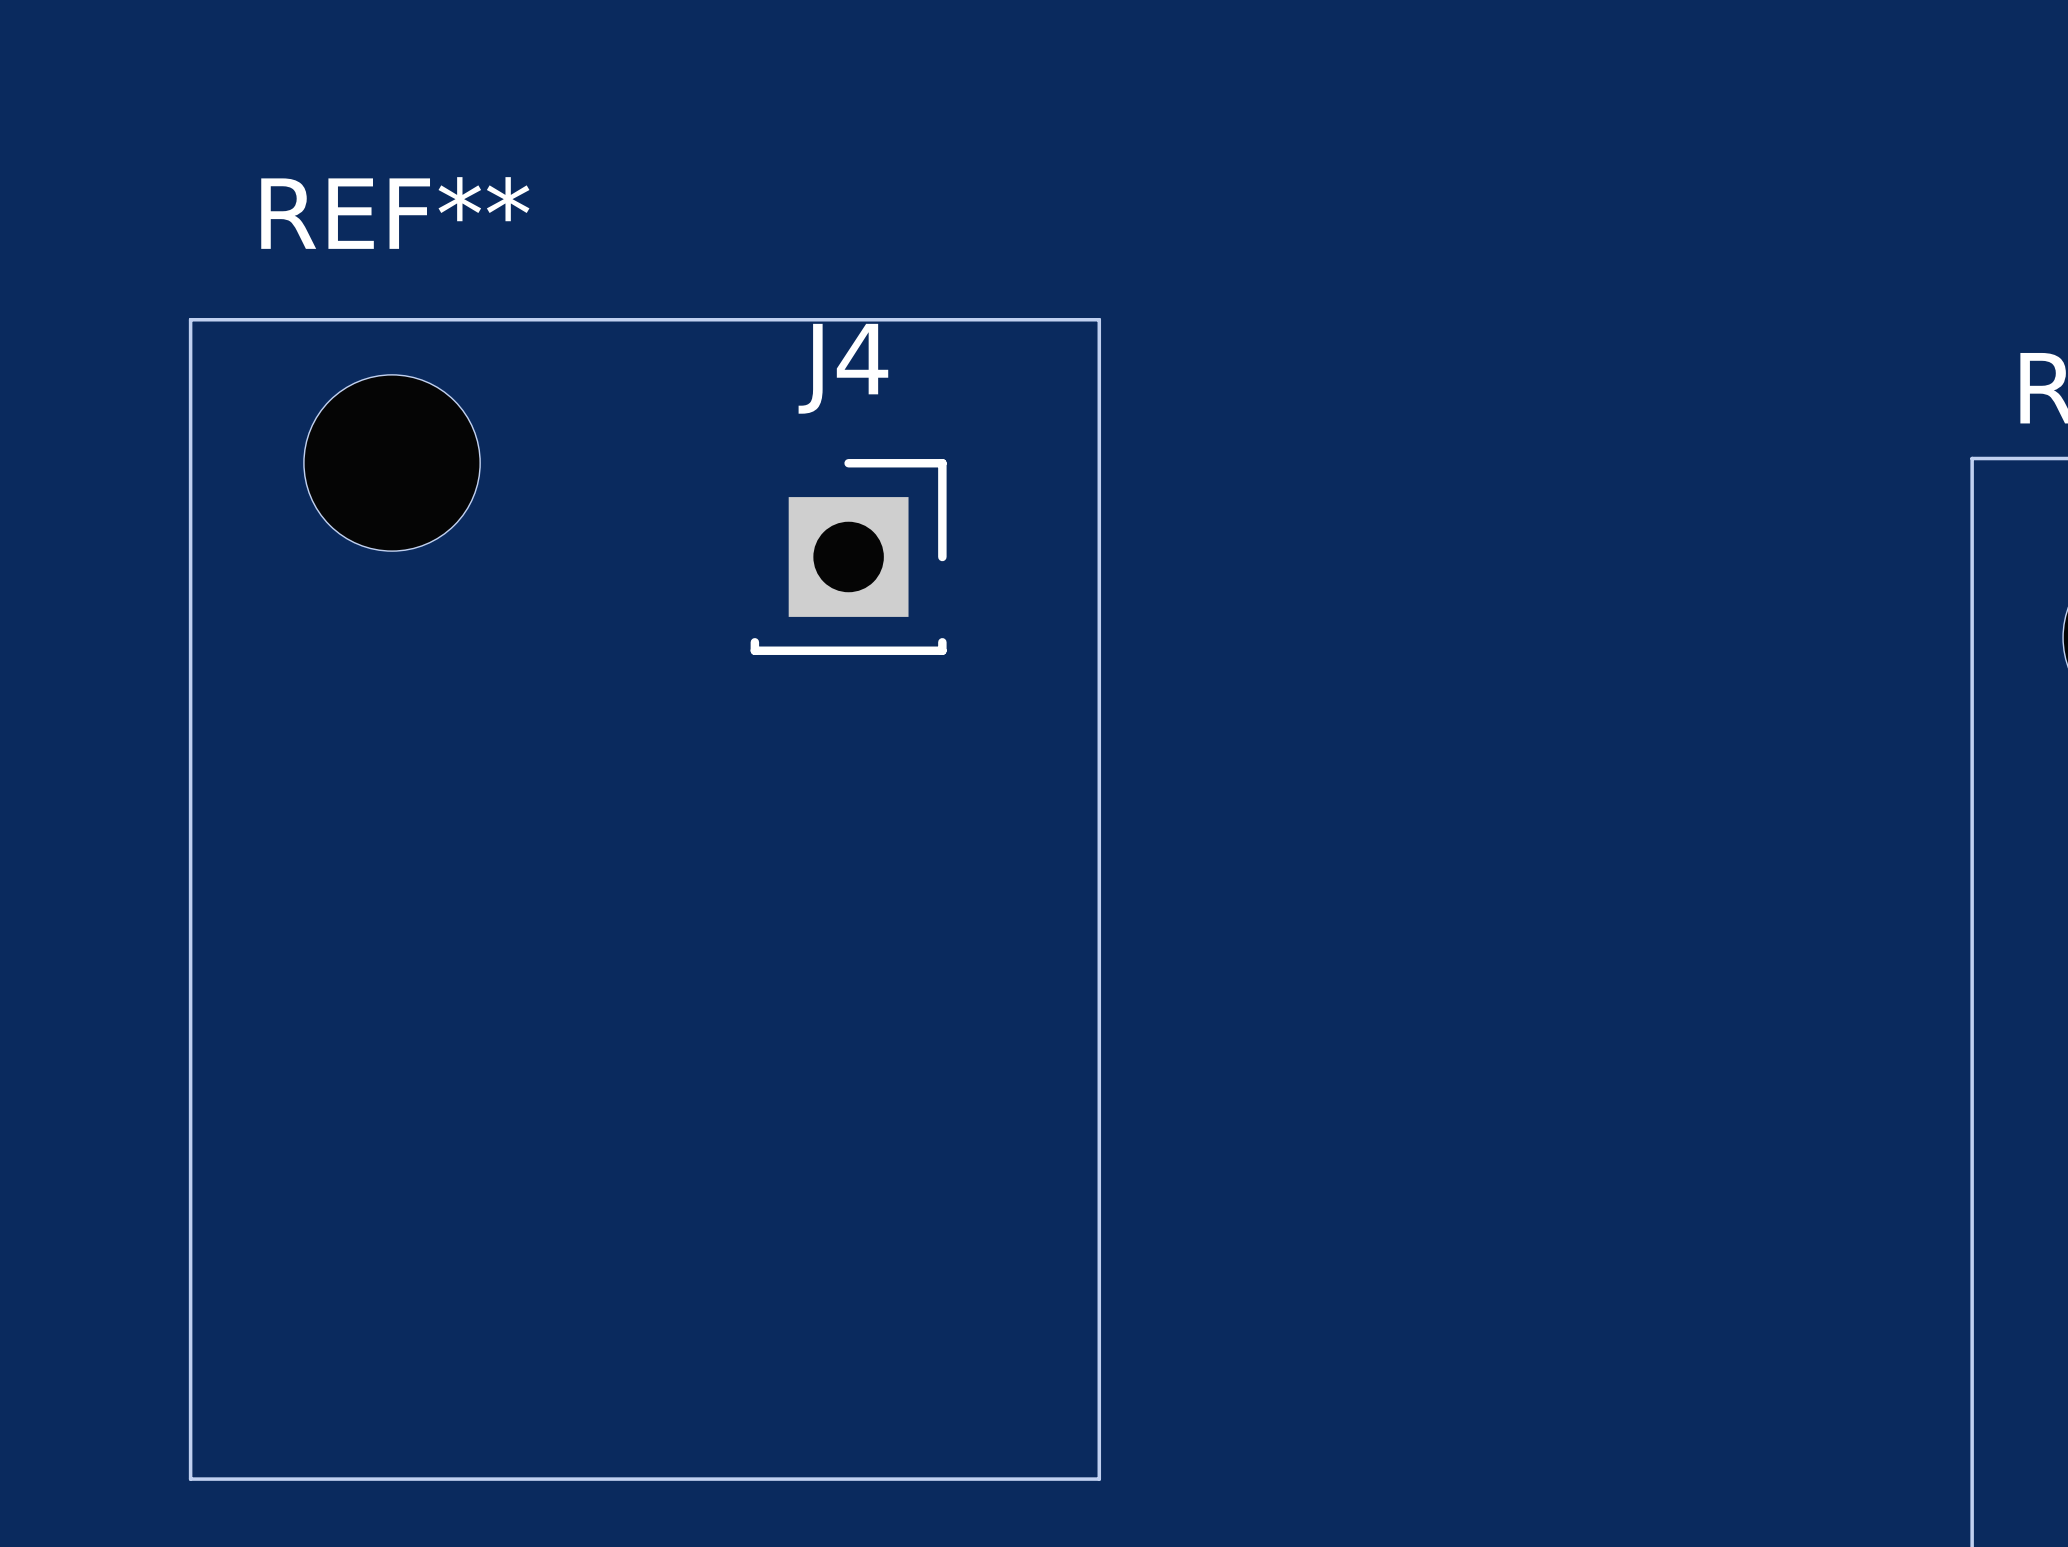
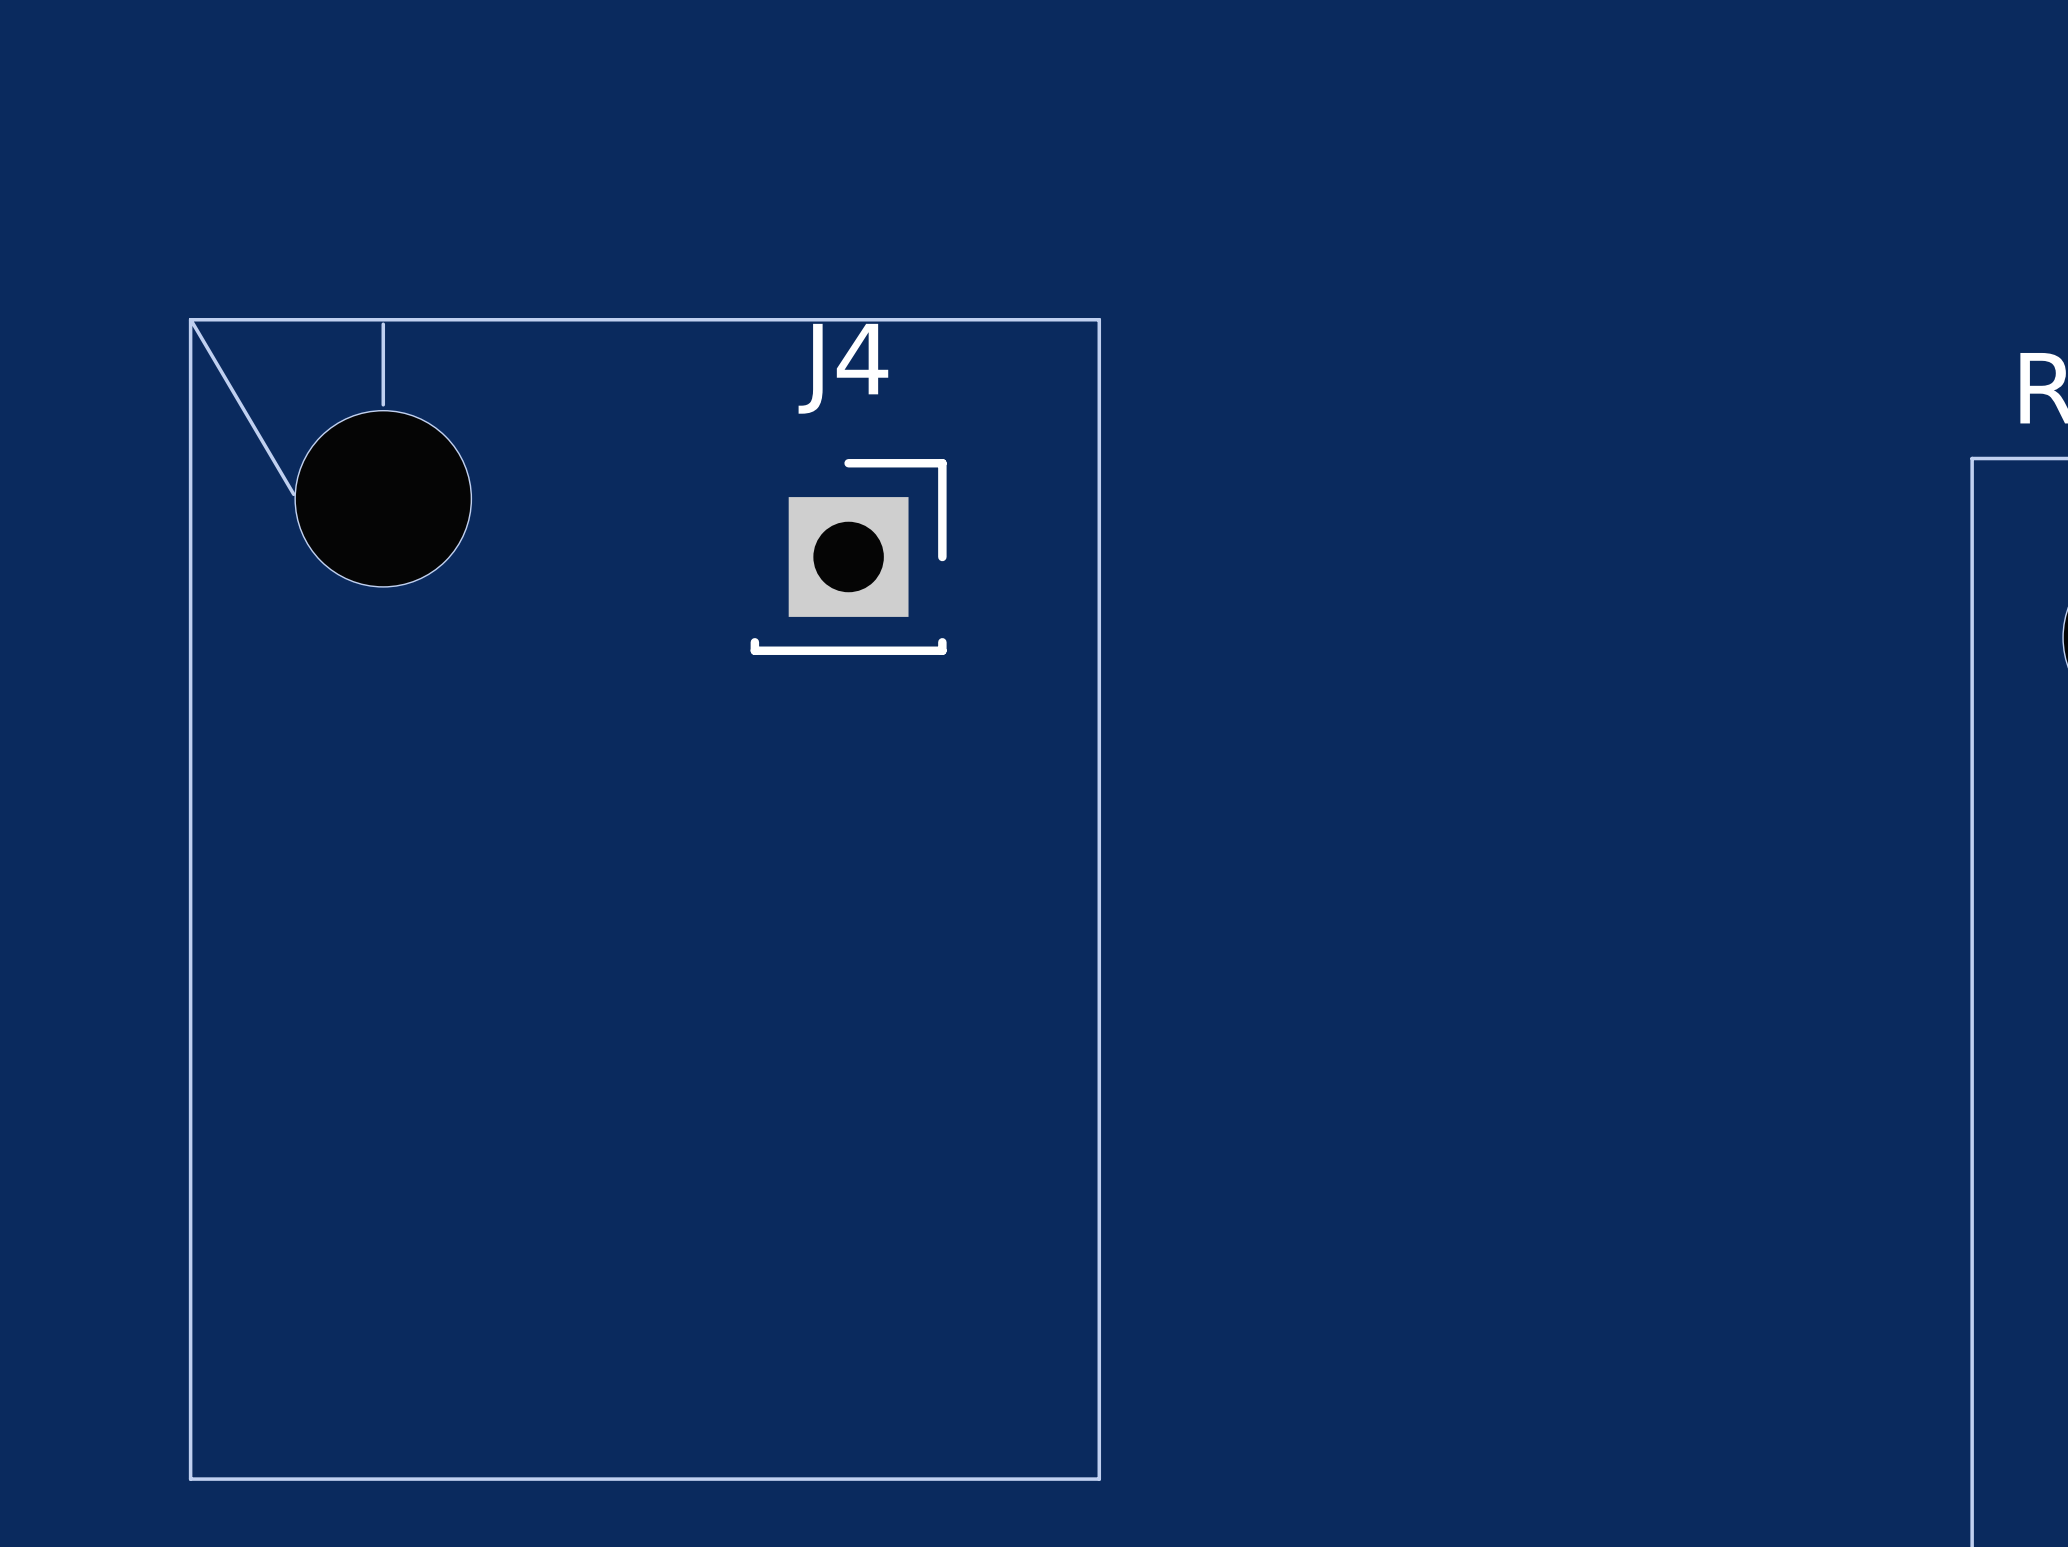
board edge: none -> (190, 319) (293, 494)
board edge: none -> (383, 324) (383, 404)
REF** position: (392, 462) -> (383, 498)

